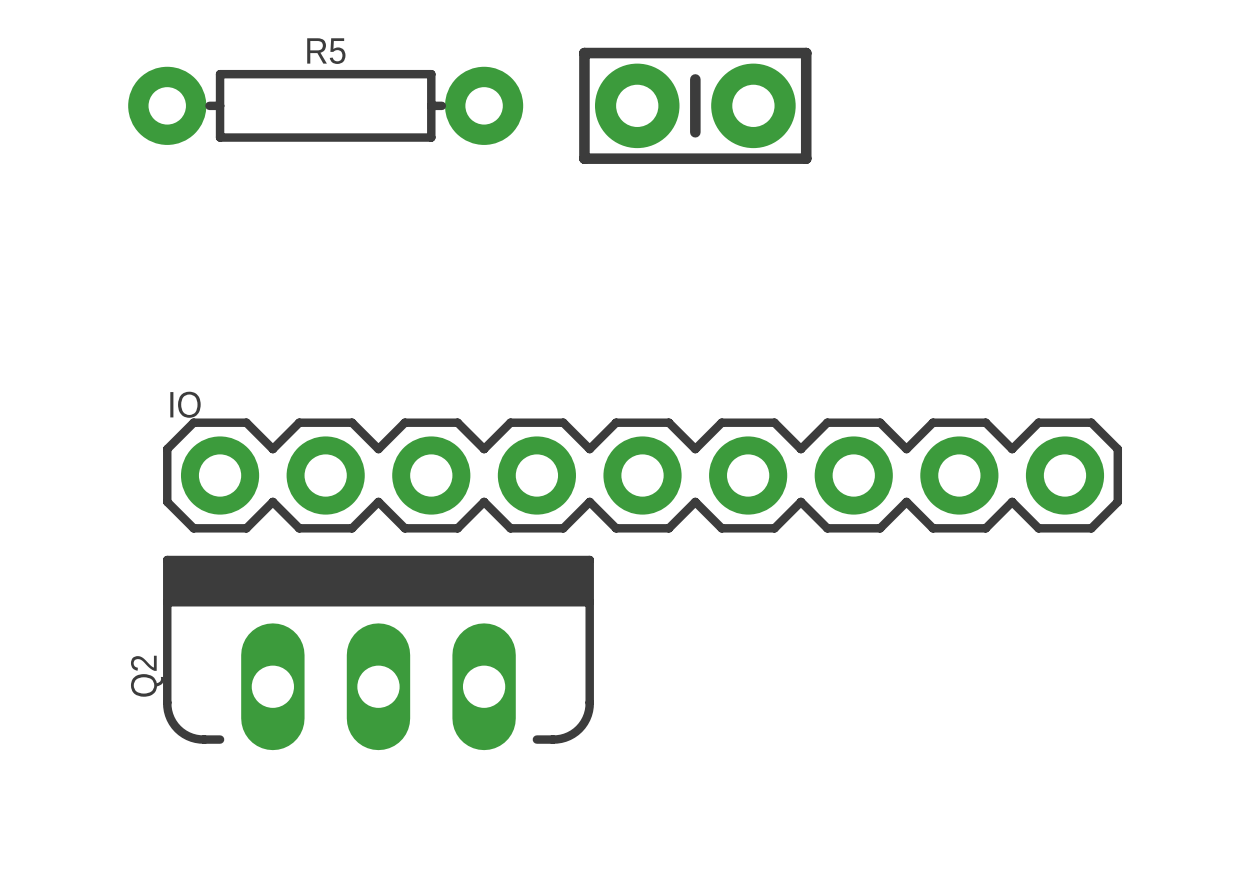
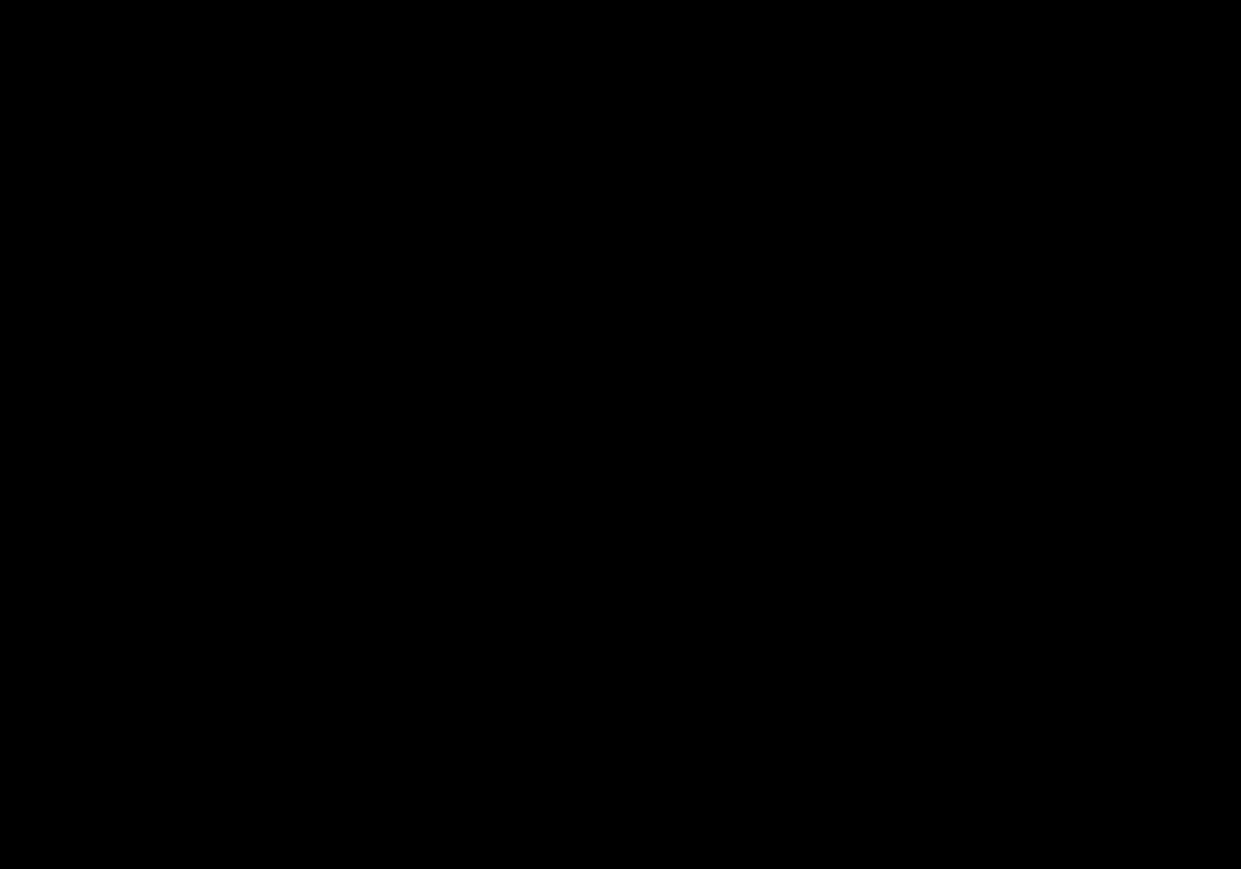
R5: (325, 105) -> none
part: (695, 105) -> none
IO: (642, 475) -> none
Q2: (378, 652) -> none

